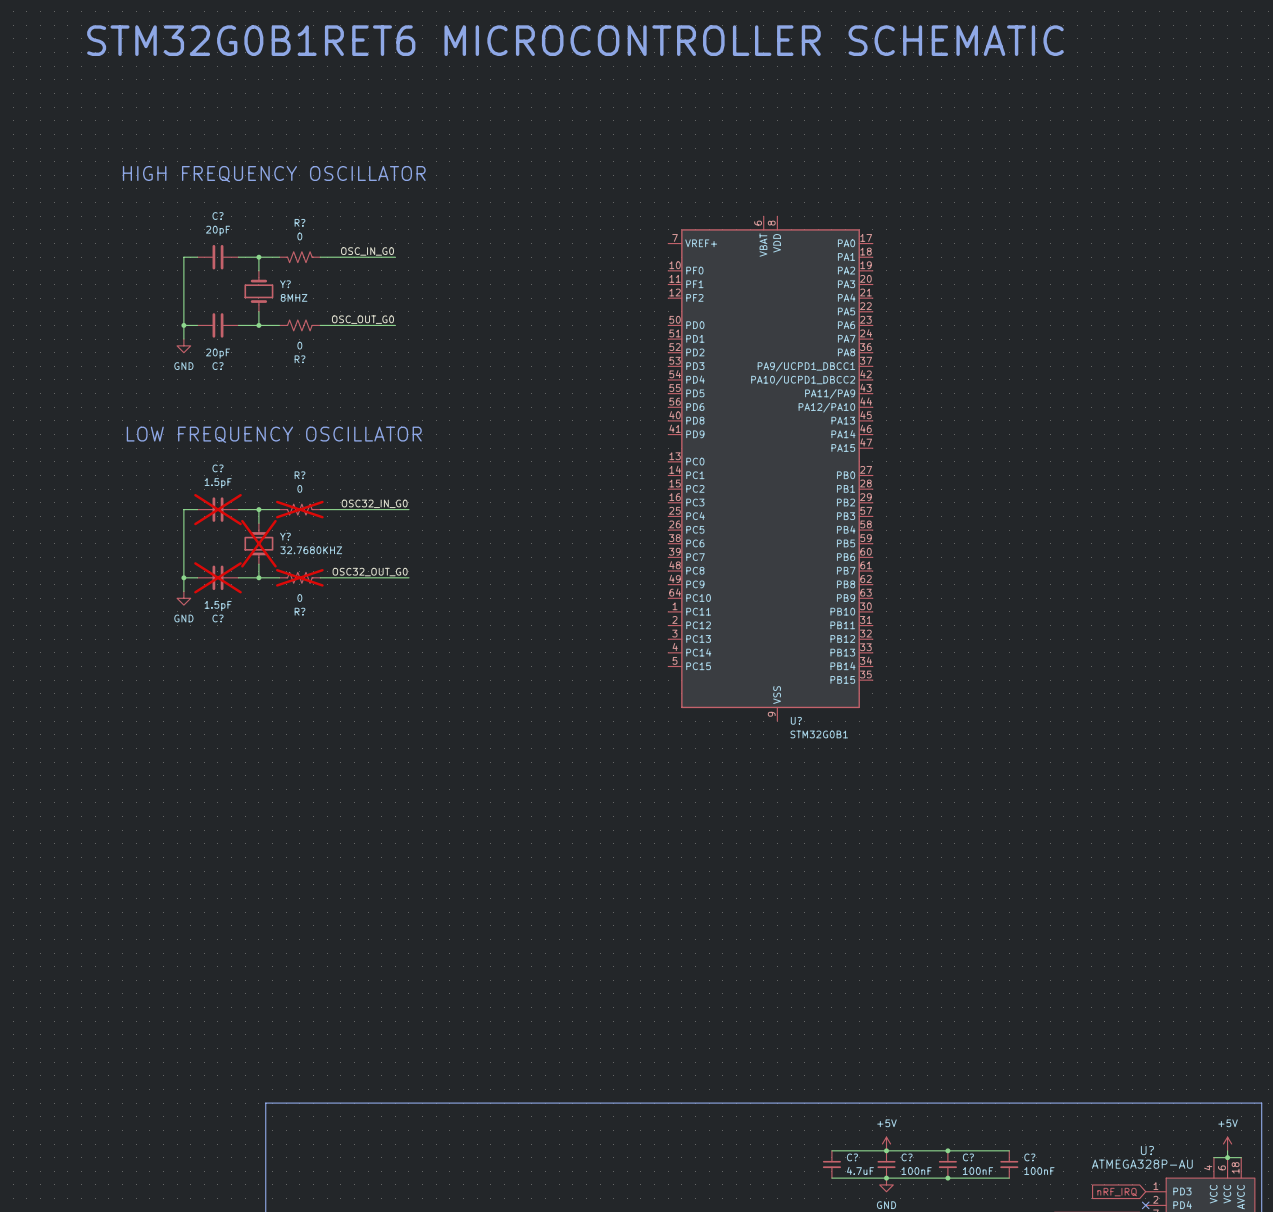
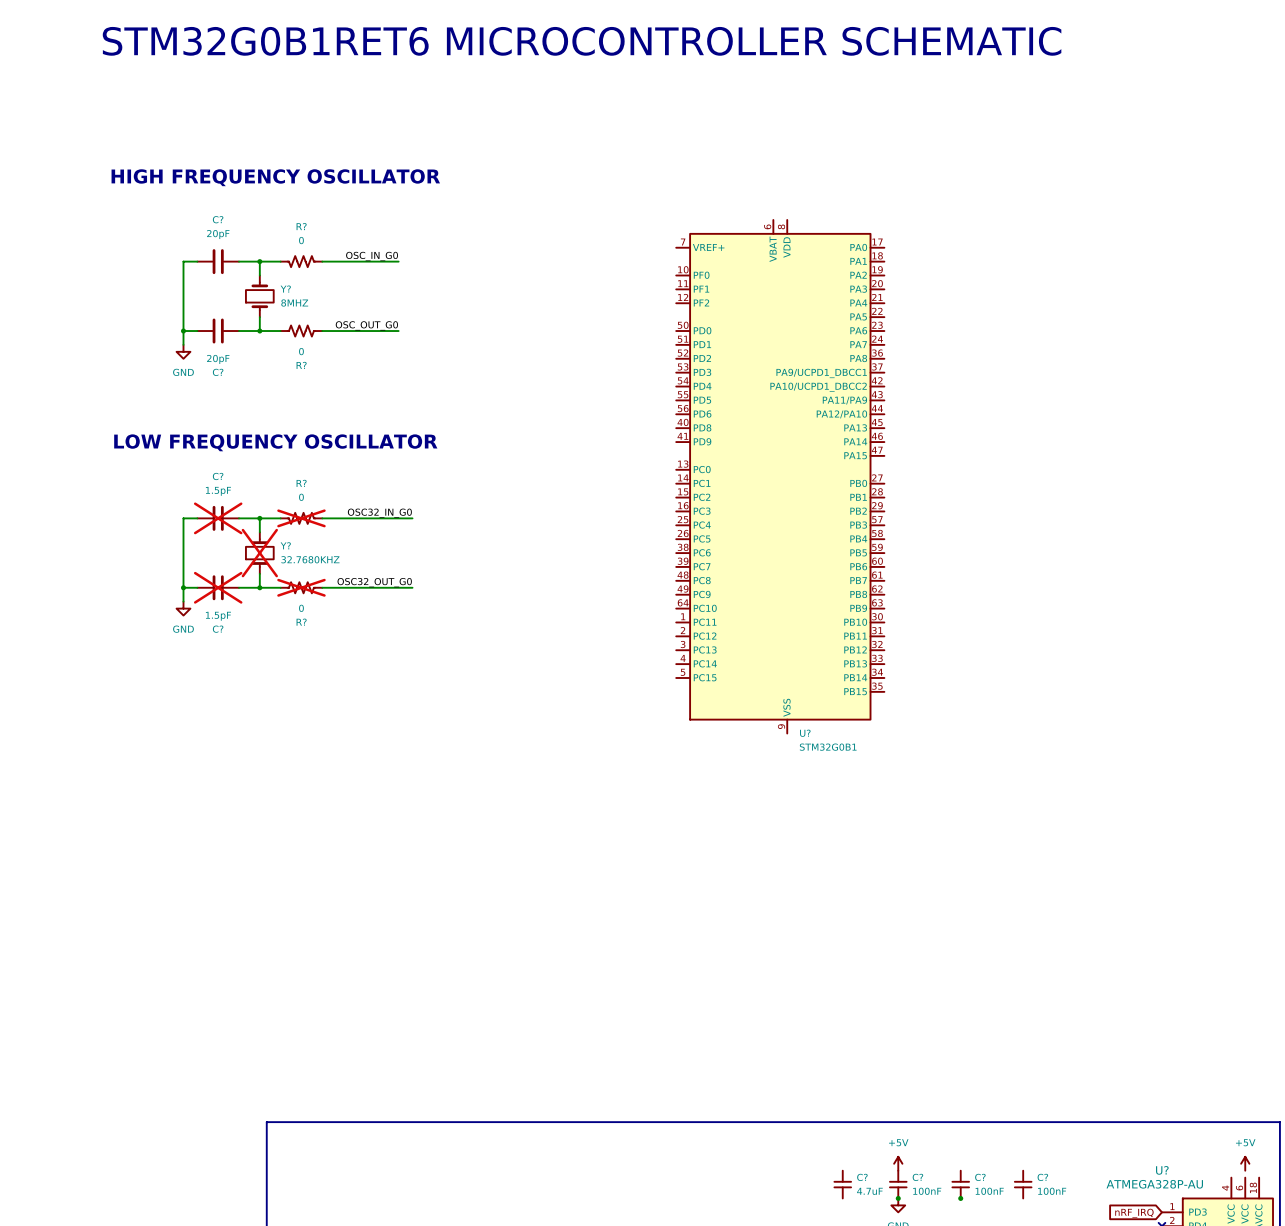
wire: (831, 1150) (1009, 1150) -> none
junction: (886, 1150) -> none
junction: (947, 1150) -> none
wire: (1227, 1150) (1227, 1157) -> none
wire: (1213, 1157) (1241, 1157) -> none
junction: (1227, 1157) -> none
wire: (831, 1178) (1009, 1178) -> none

